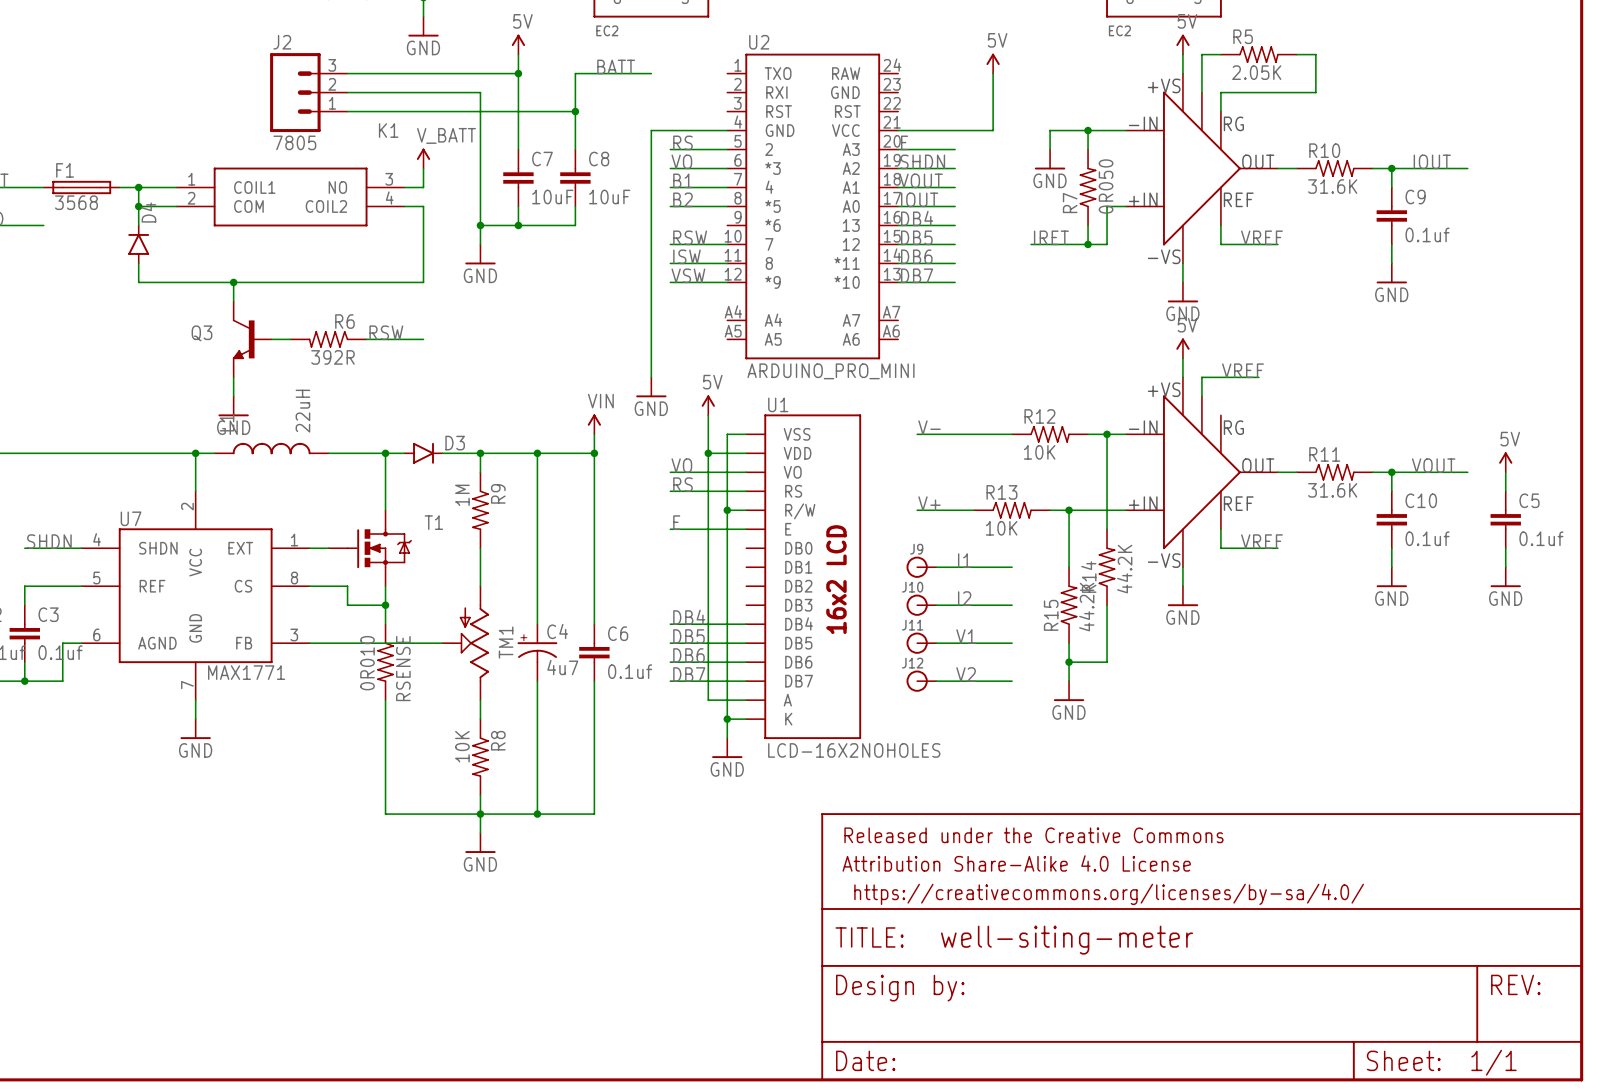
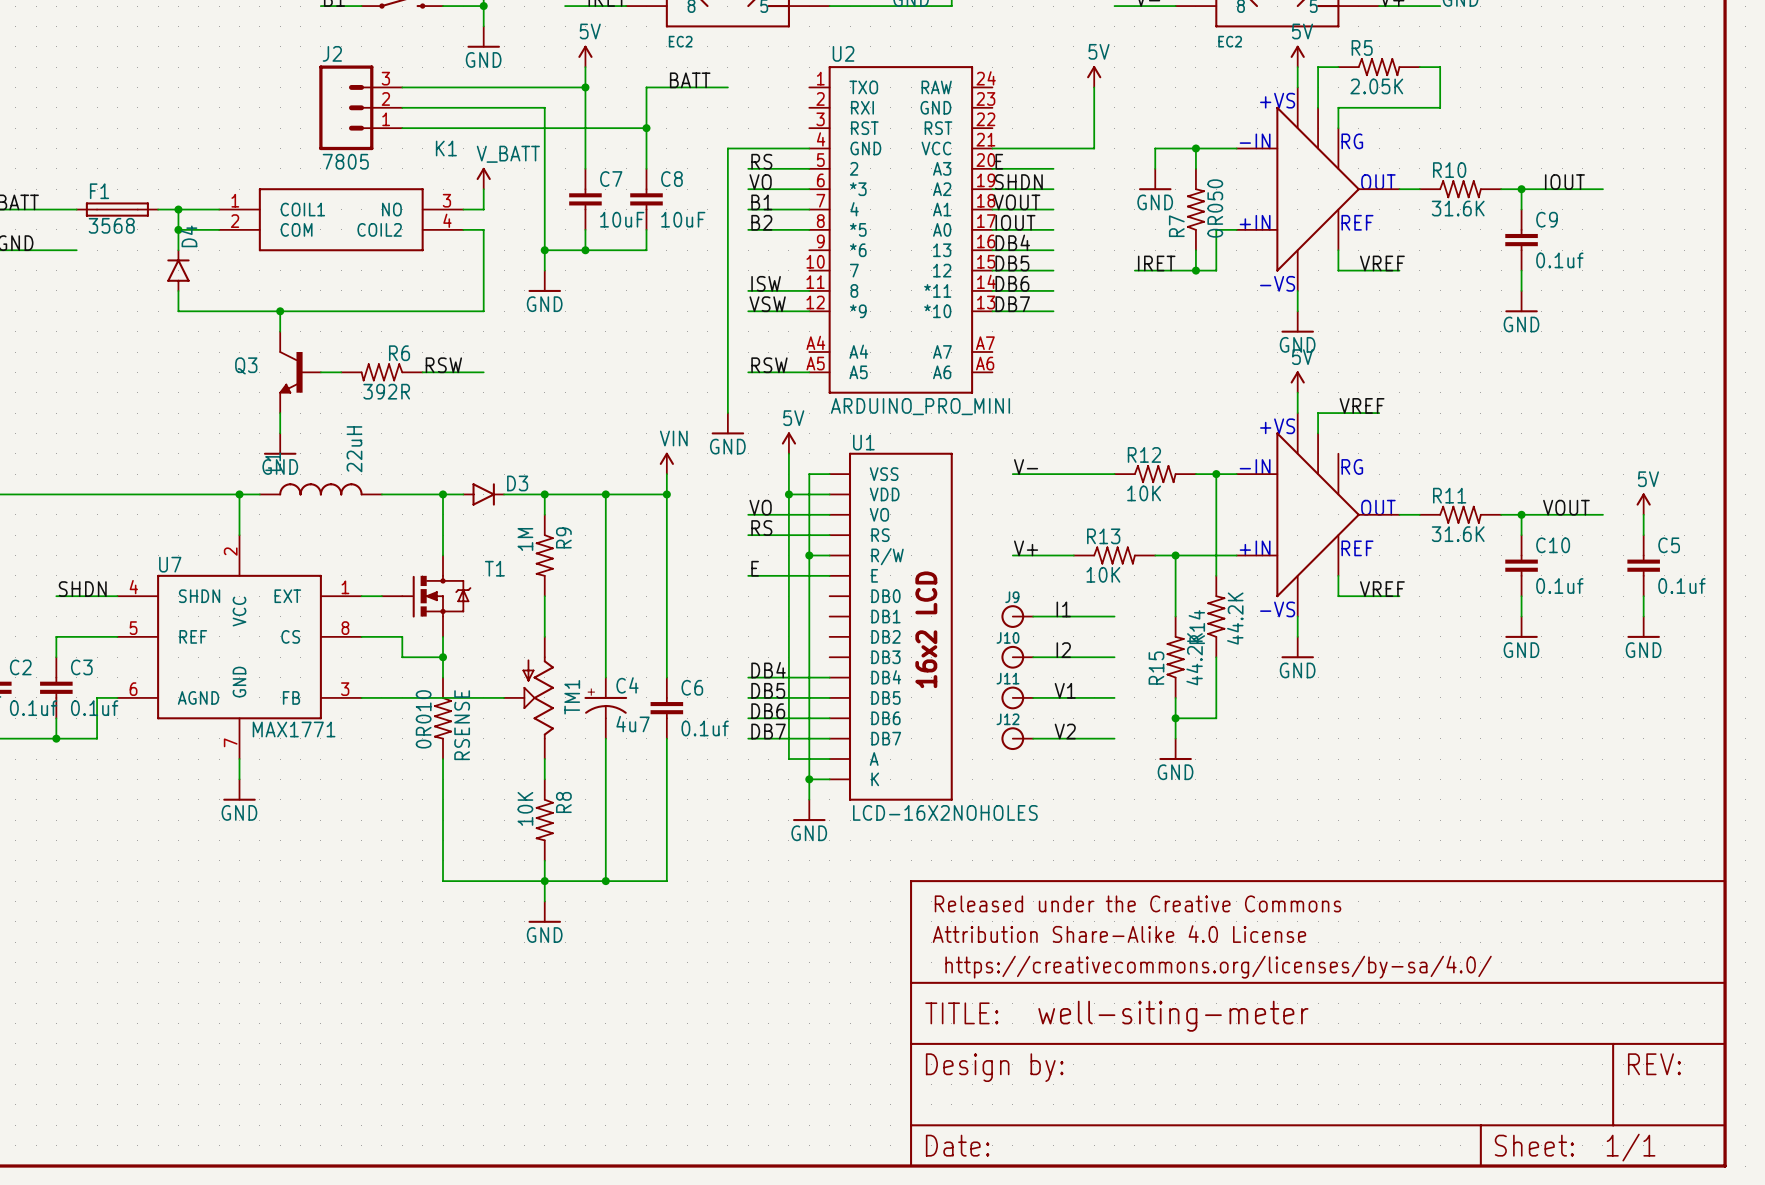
label position: RSW (690, 237) -> RSW (769, 365)
wire: (670, 244) (727, 244) -> (748, 372) (809, 372)

